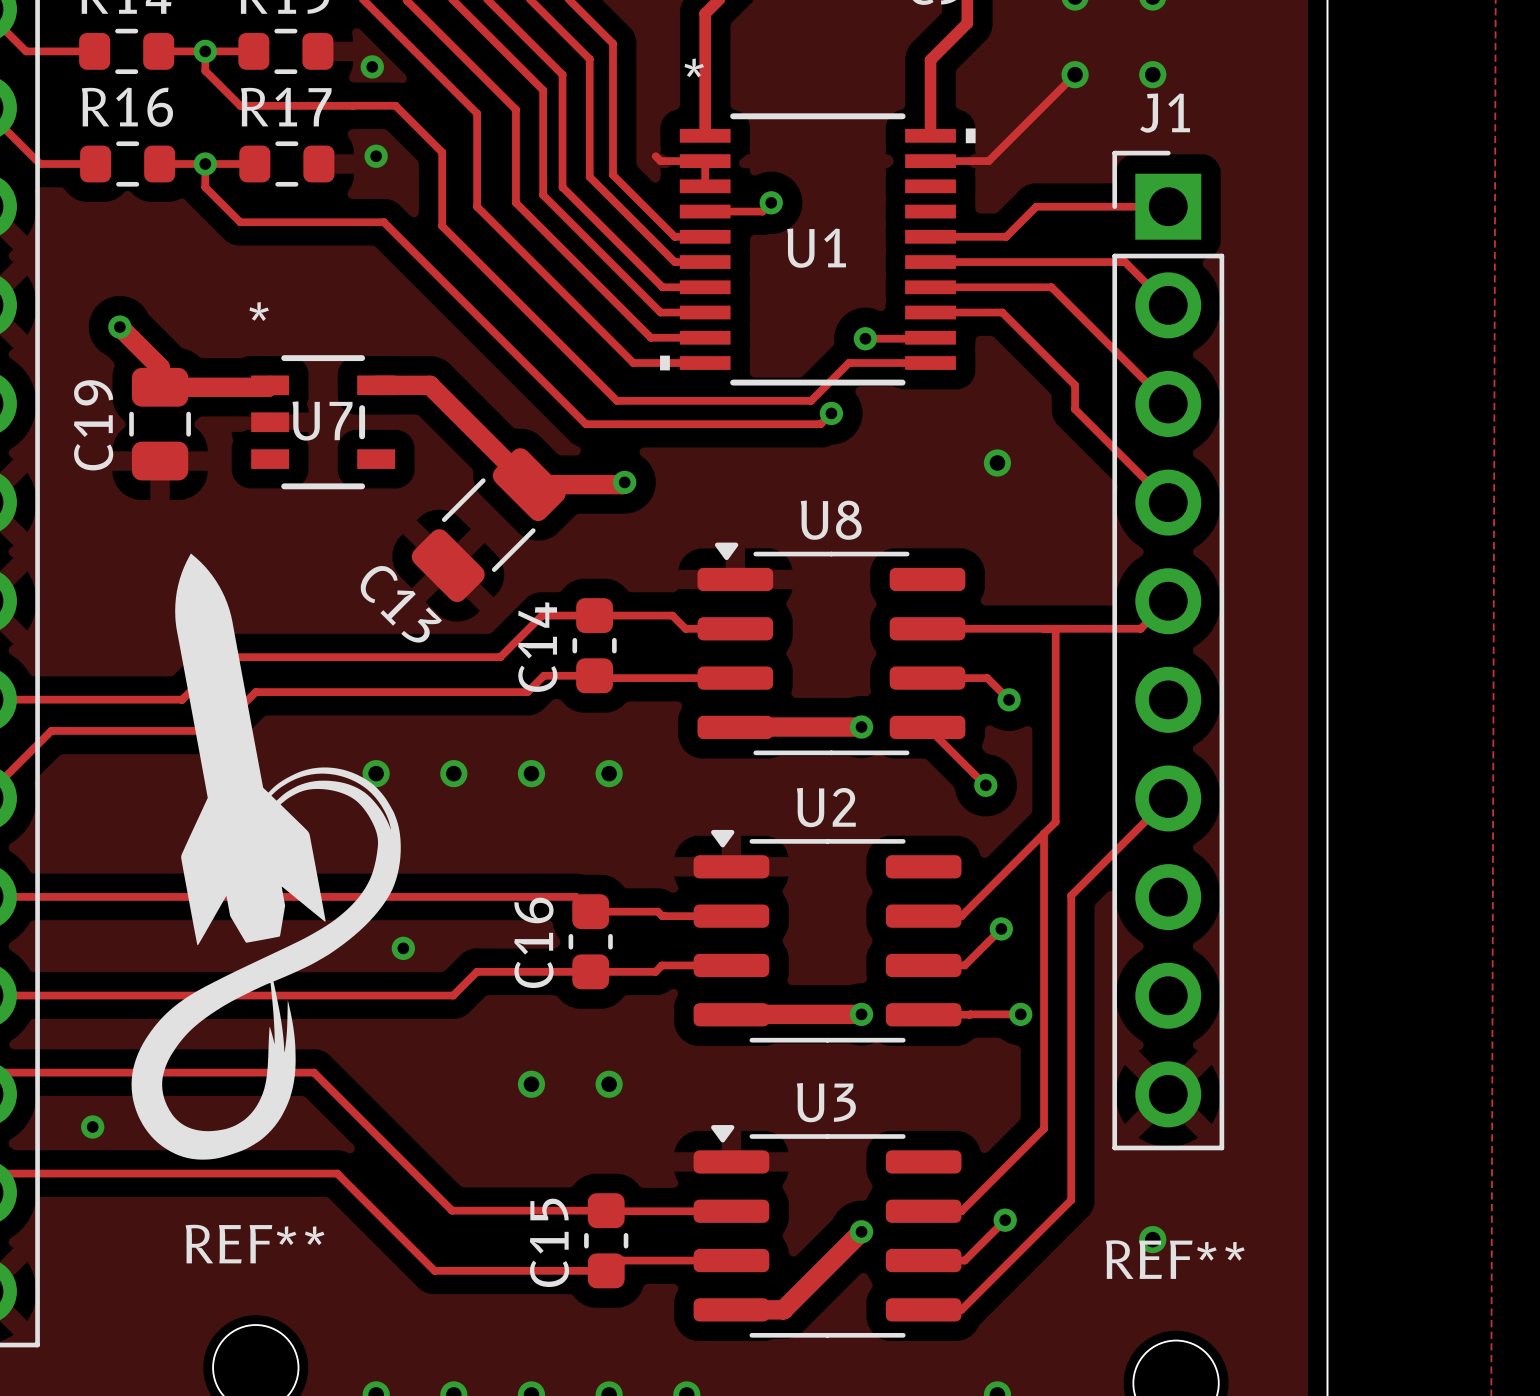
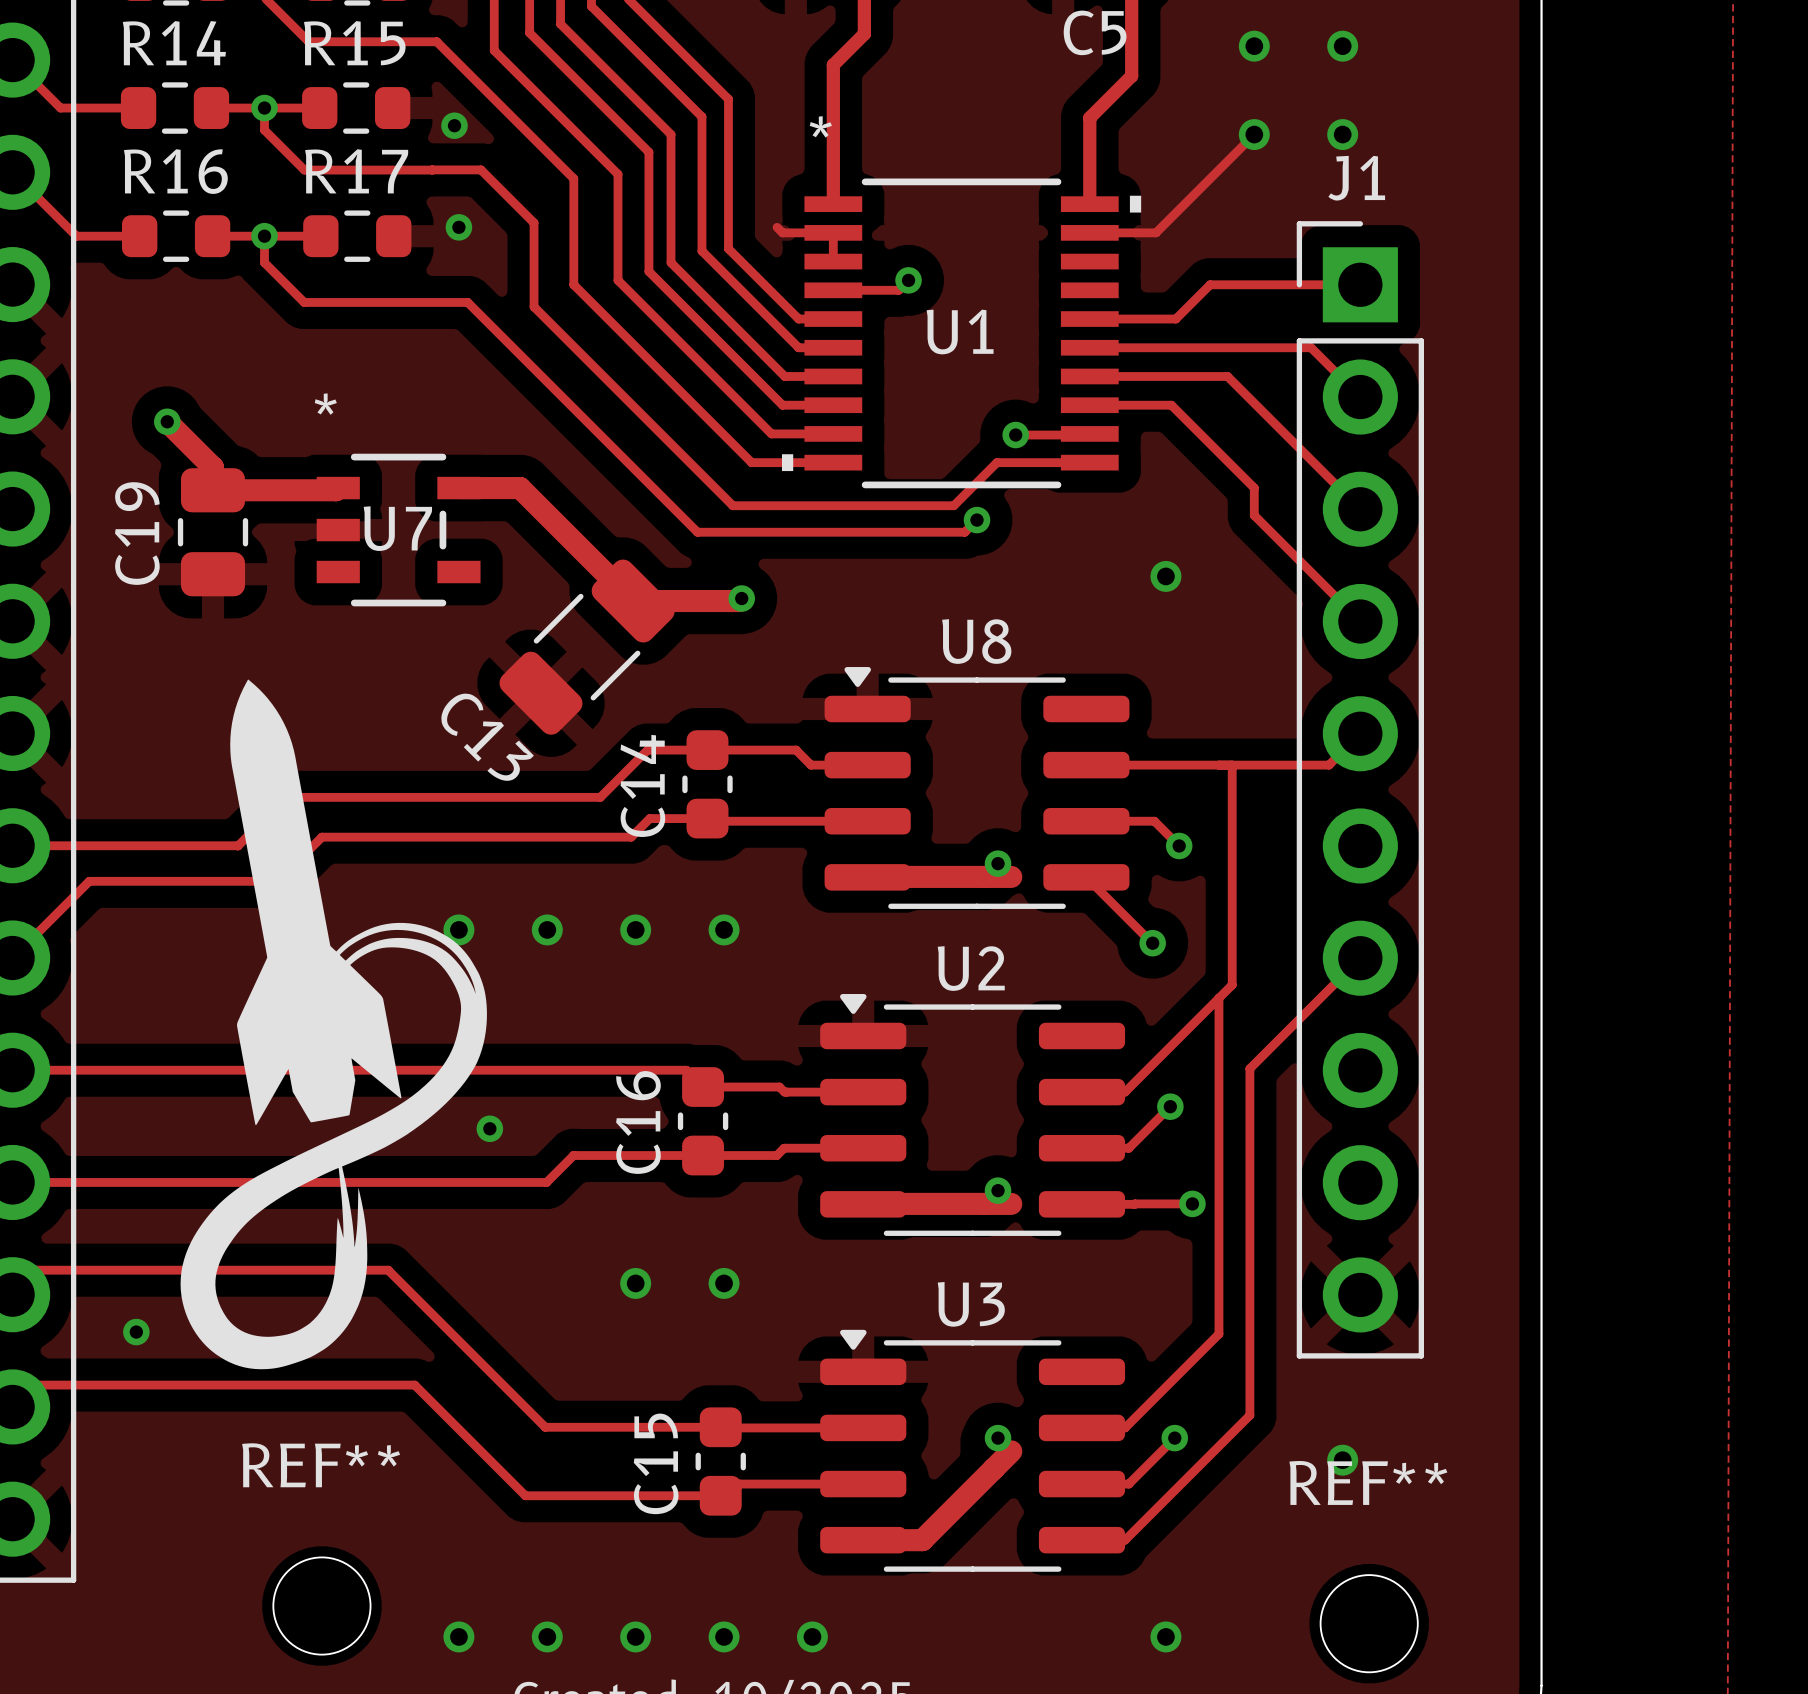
via position: (861, 727) -> (998, 863)
via position: (861, 1014) -> (998, 1190)
via position: (861, 1231) -> (998, 1438)

